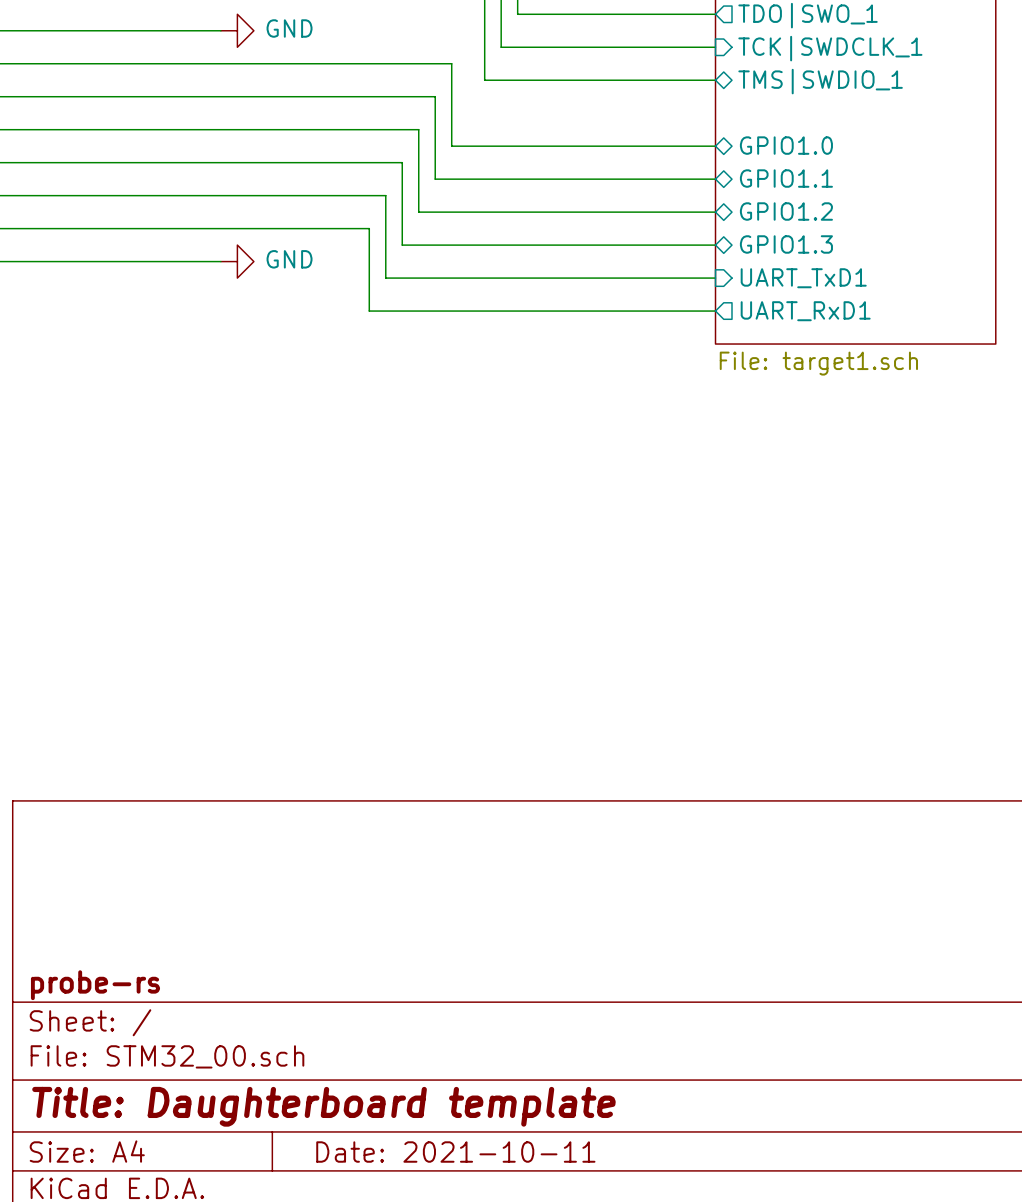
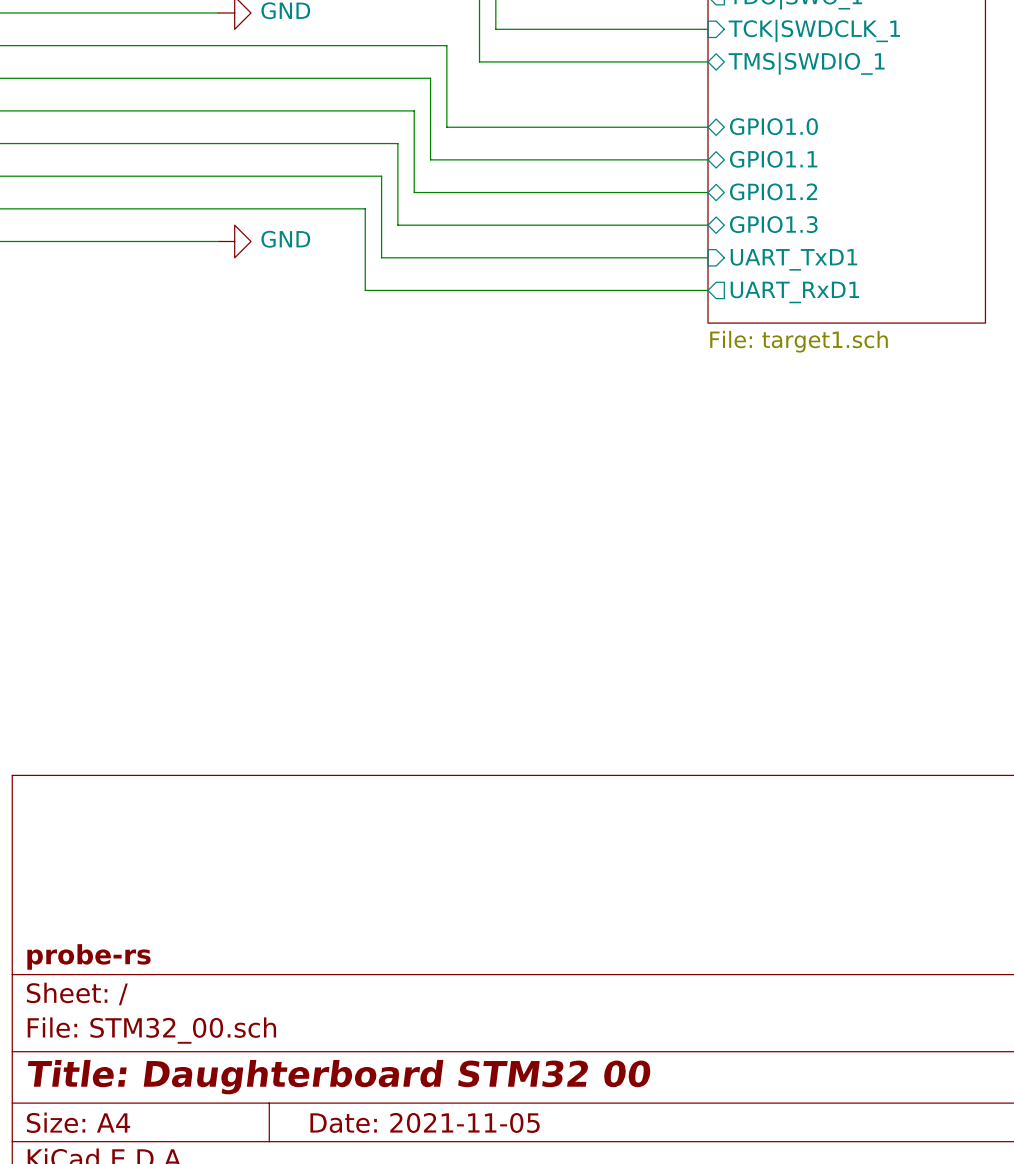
title block: Title: Daughterboard template (323, 1106) -> Title: Daughterboard STM32 00 (339, 1077)
title block: Date: 2021-10-11 (455, 1152) -> Date: 2021-11-05 (425, 1122)

